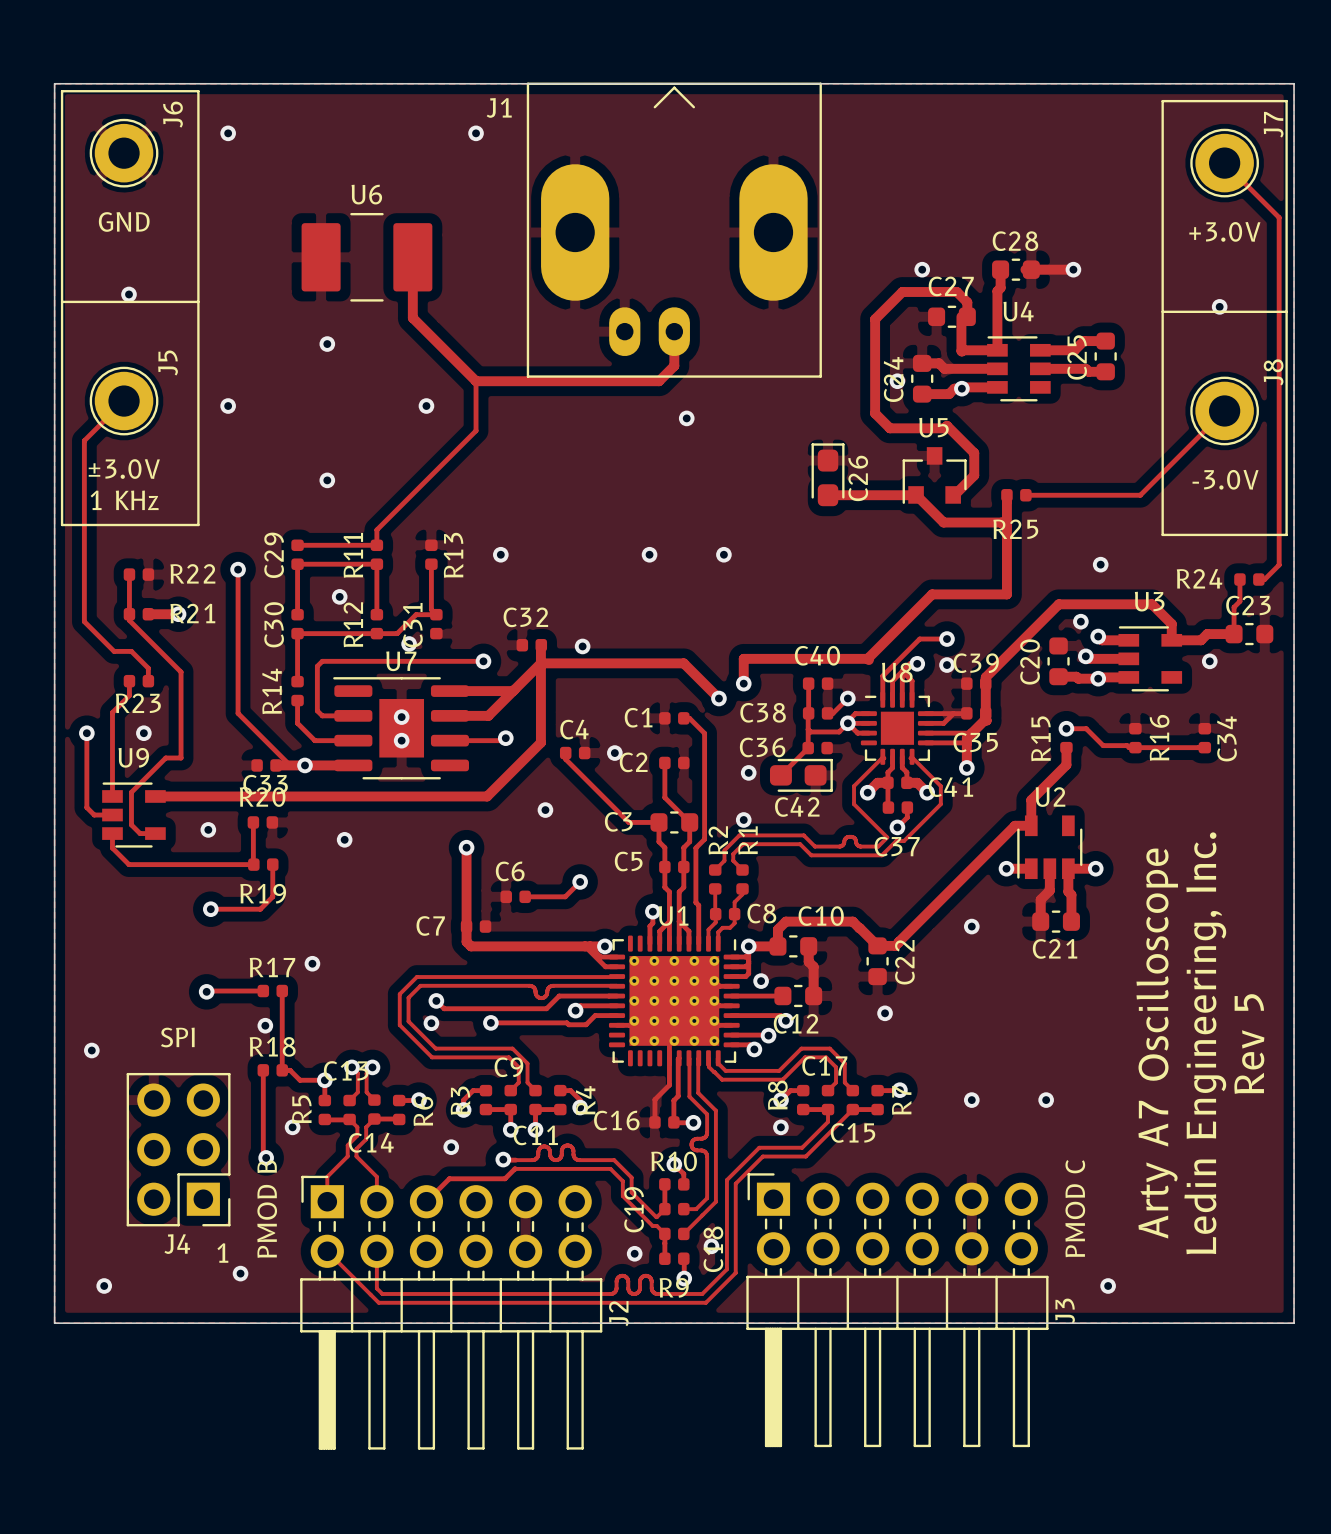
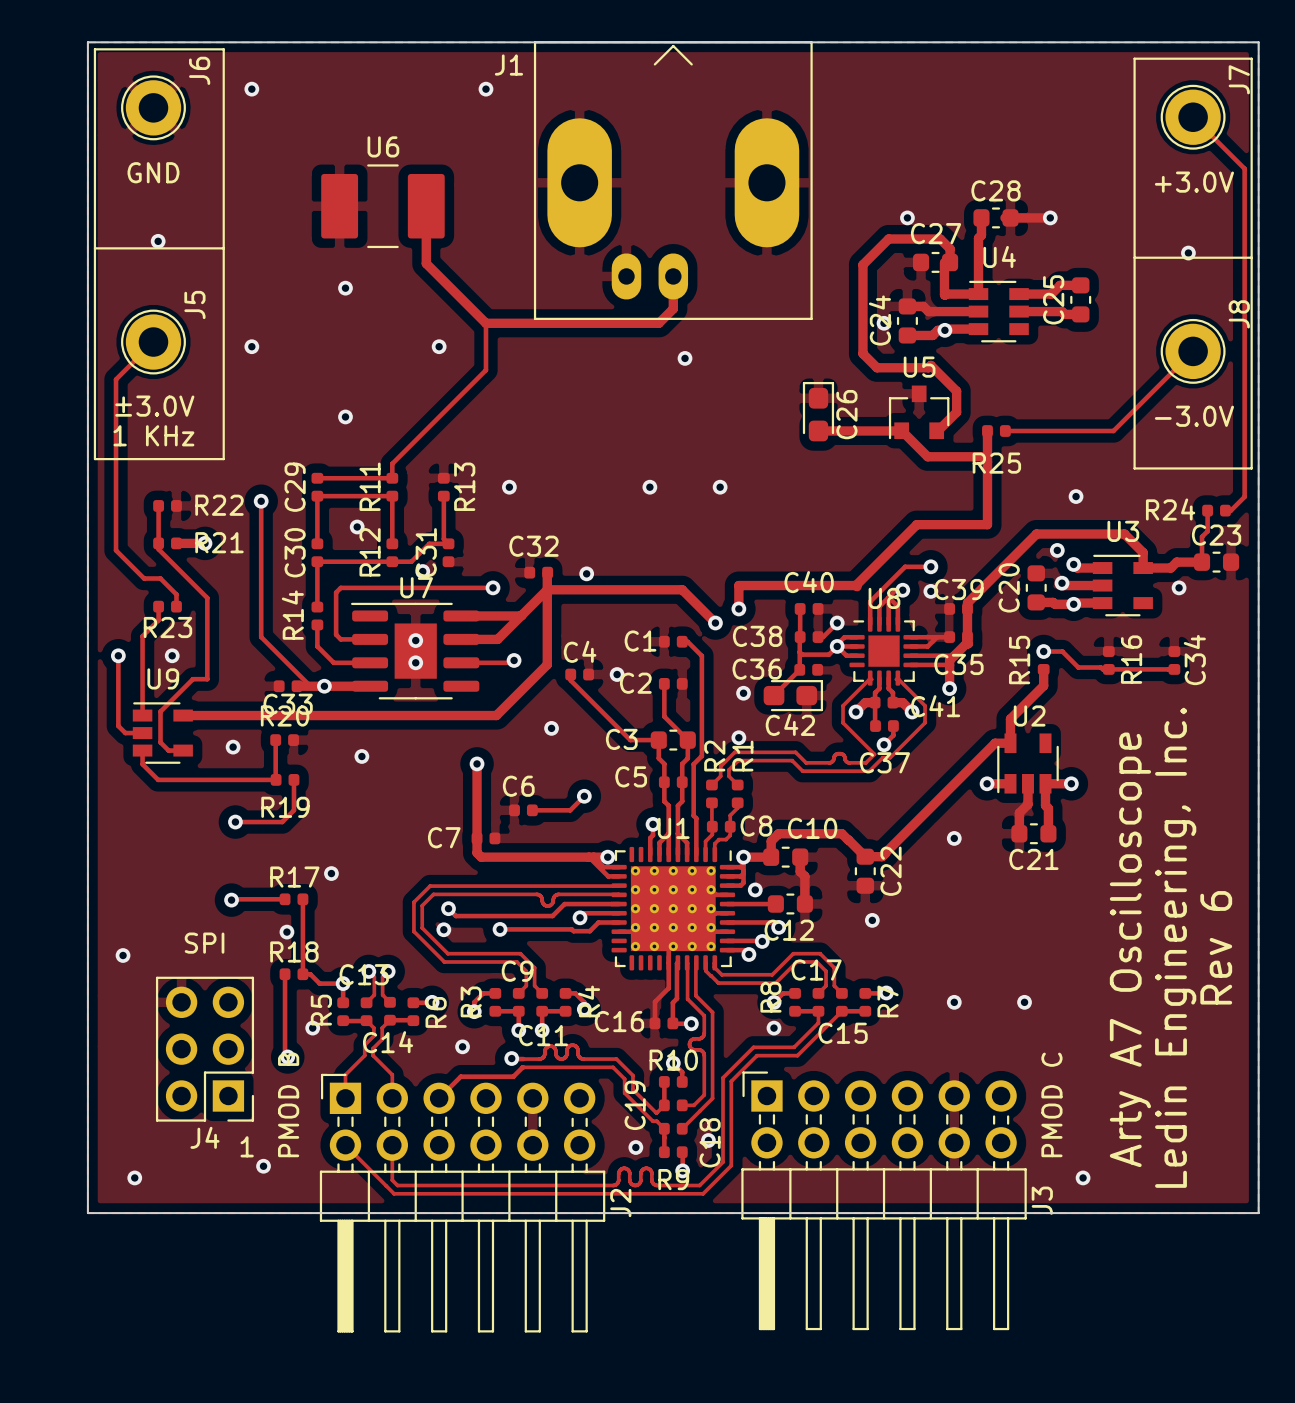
text: Rev 5 (1249, 1044) -> Rev 6 (1216, 947)

